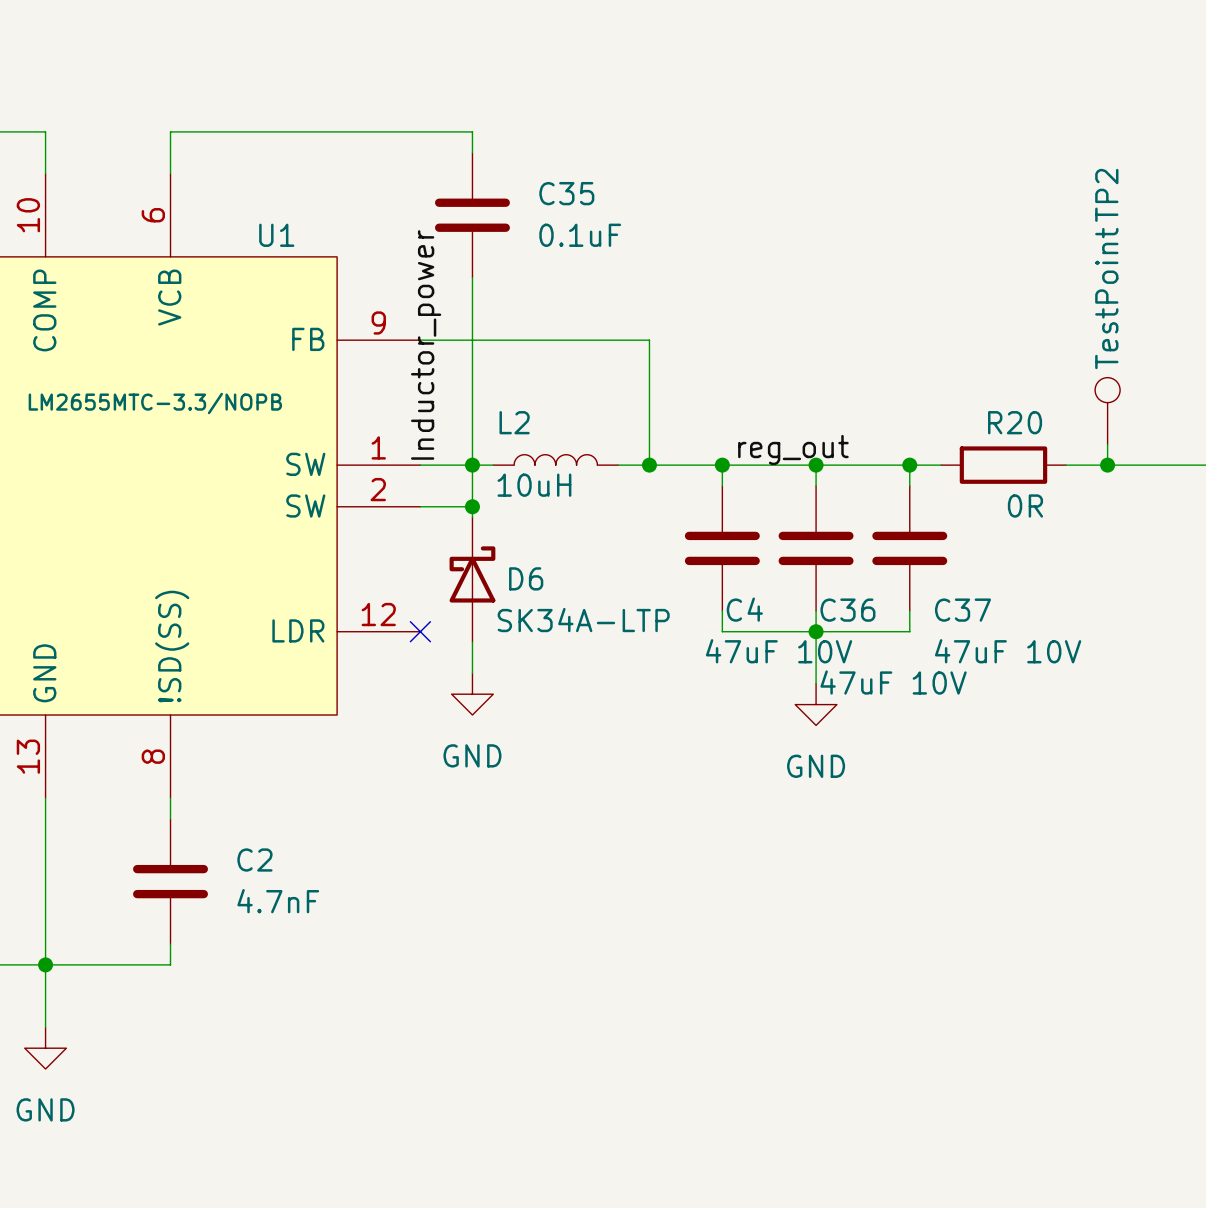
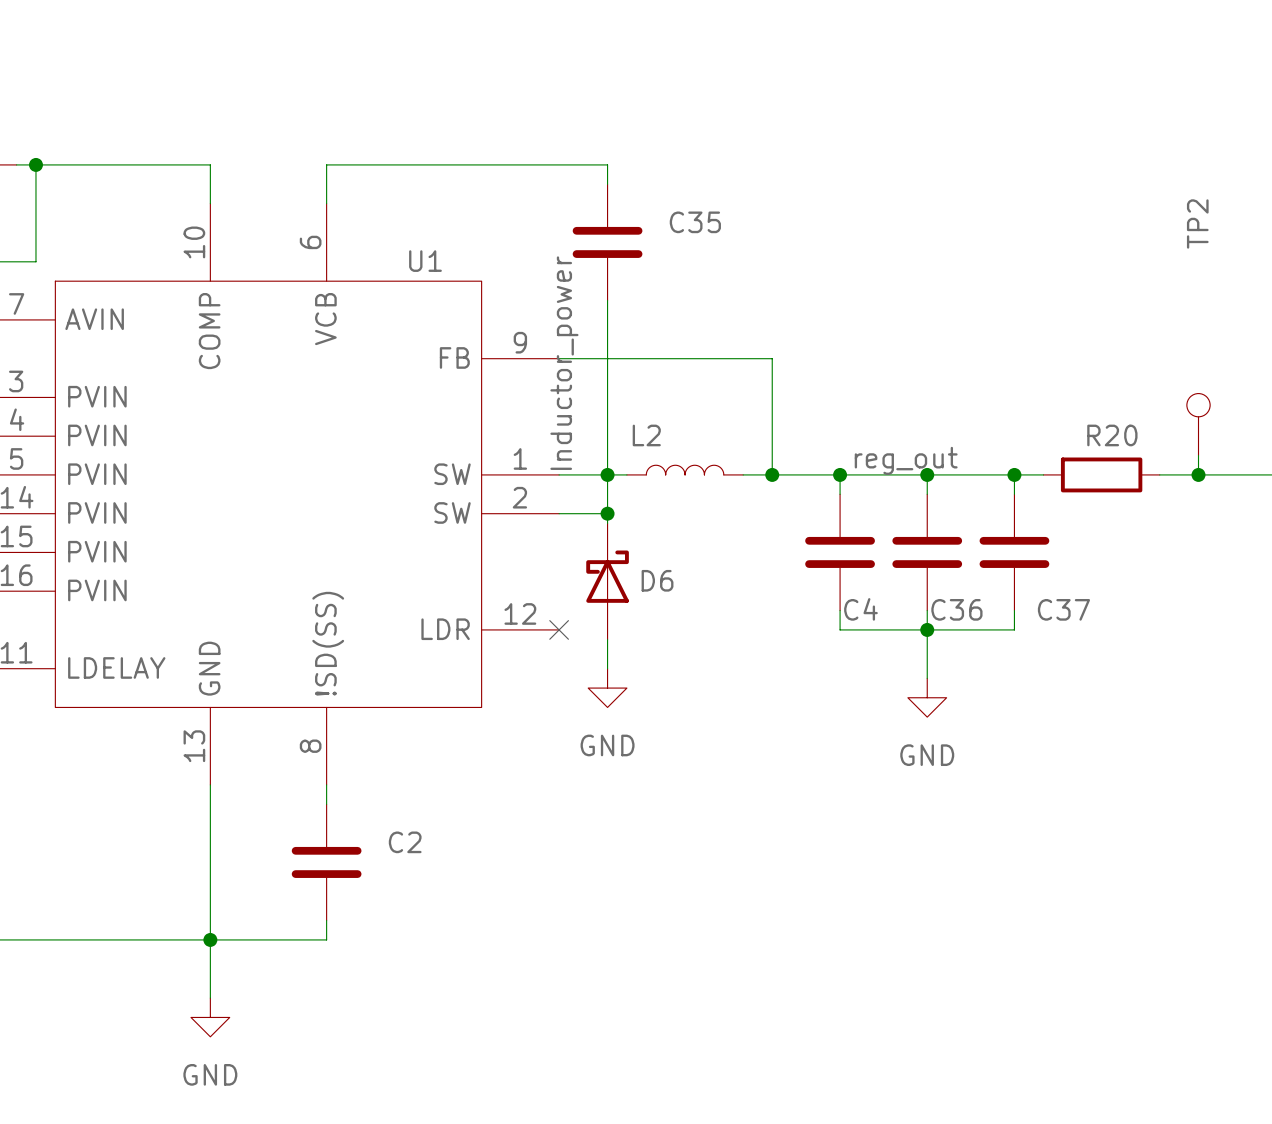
C35 value: 0.1uF (580, 235) -> none
TP2 value: TestPoint (1106, 298) -> none
U1 value: LM2655MTC-3.3/NOPB (155, 403) -> none
L2 value: 10uH (534, 485) -> none
R20 value: 0R (1025, 505) -> none
D6 value: SK34A-LTP (583, 620) -> none
C4 value: 47uF 10V (779, 651) -> none
C37 value: 47uF 10V (1008, 651) -> none
C36 value: 47uF 10V (893, 682) -> none
C2 value: 4.7nF (278, 901) -> none

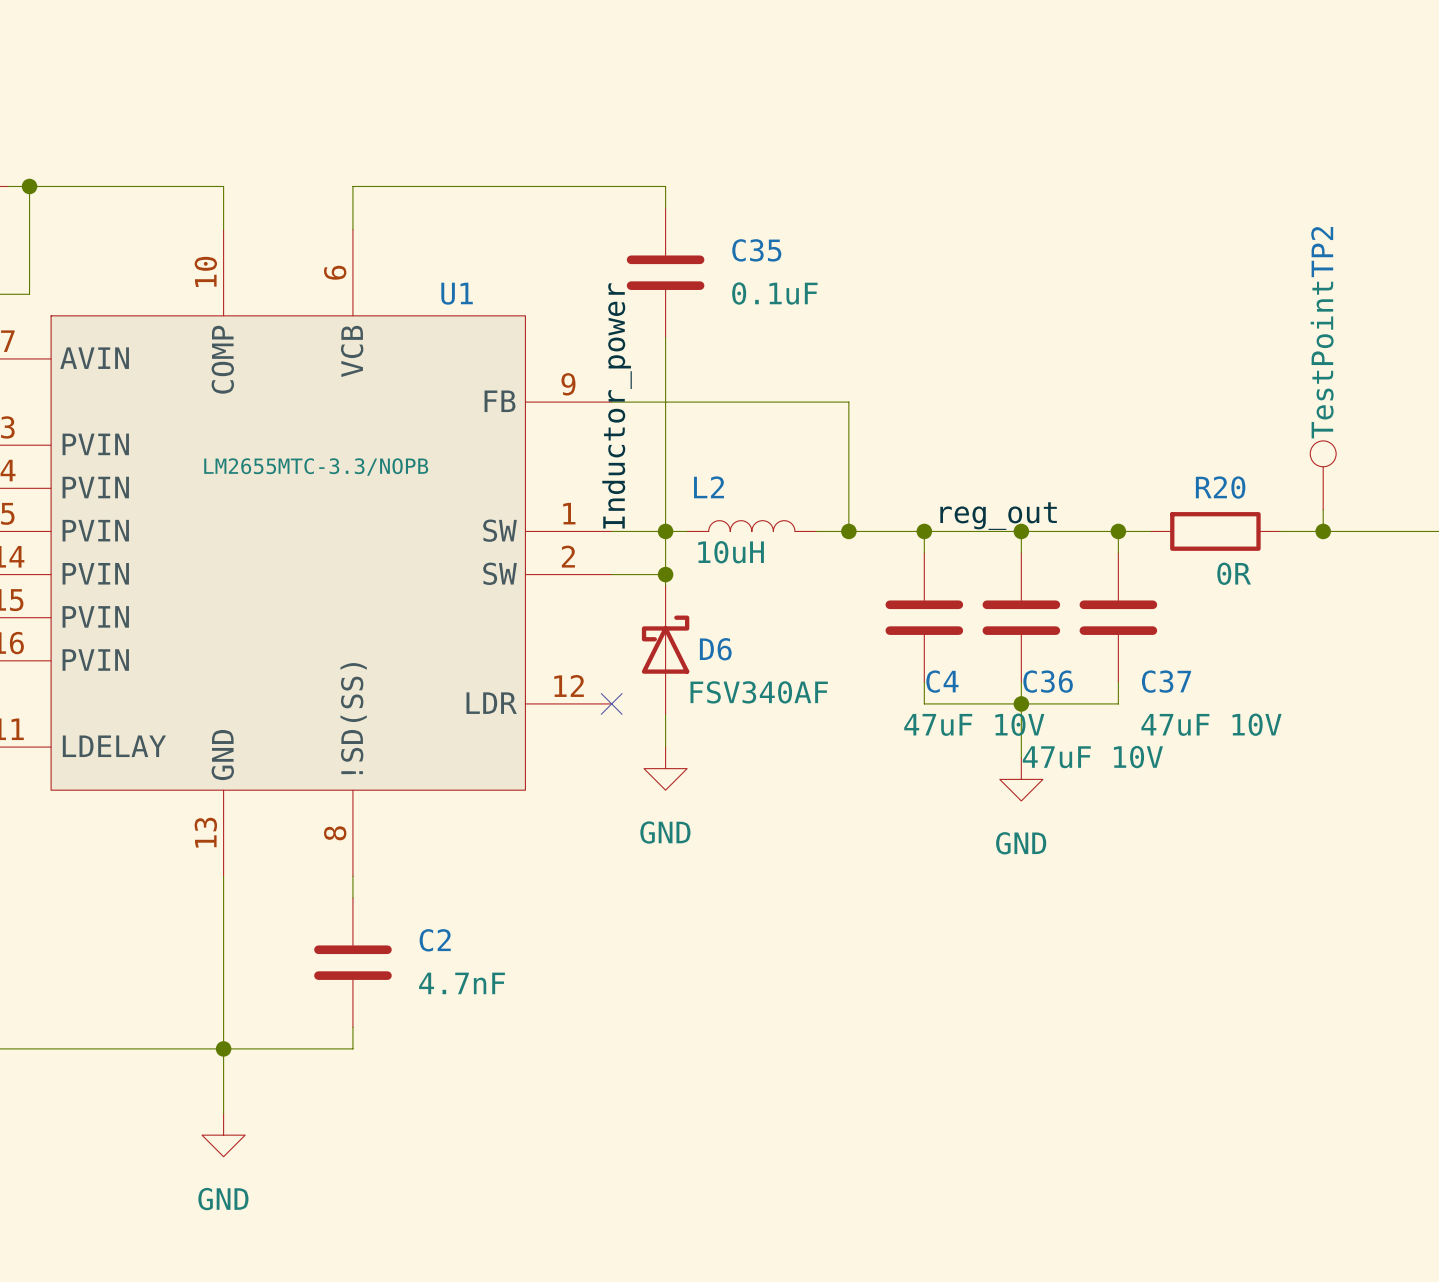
C35 value: none -> 0.1uF (774, 293)
TP2 value: none -> TestPoint (1322, 360)
U1 value: none -> LM2655MTC-3.3/NOPB (316, 467)
L2 value: none -> 10uH (731, 552)
R20 value: none -> 0R (1234, 573)
D6 value: none -> FSV340AF (759, 692)
C4 value: none -> 47uF 10V (974, 724)
C37 value: none -> 47uF 10V (1211, 724)
C36 value: none -> 47uF 10V (1092, 757)
C2 value: none -> 4.7nF (462, 983)

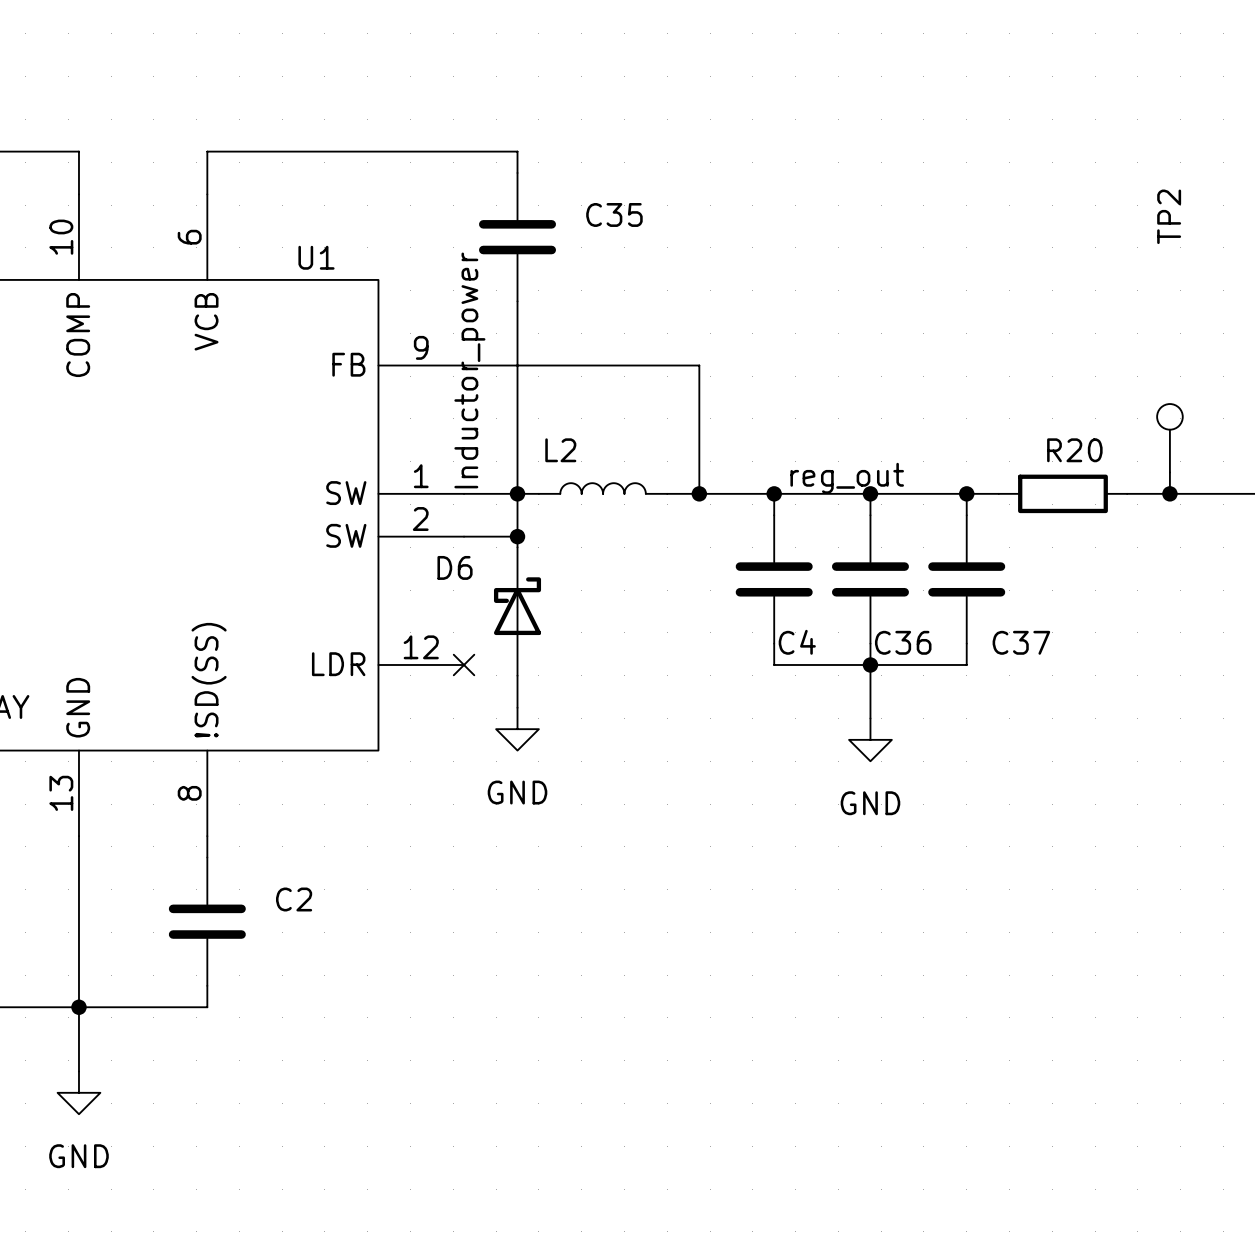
C35 value: 0.1uF (774, 293) -> none
TP2 value: TestPoint (1322, 360) -> none
U1 value: LM2655MTC-3.3/NOPB (316, 467) -> none
L2 value: 10uH (731, 552) -> none
R20 value: 0R (1234, 573) -> none
D6 name position: D6 (715, 649) -> D6 (455, 567)
D6 value: FSV340AF (759, 692) -> none
C4 value: 47uF 10V (974, 724) -> none
C37 value: 47uF 10V (1211, 724) -> none
C36 value: 47uF 10V (1092, 757) -> none
C2 value: 4.7nF (462, 983) -> none

